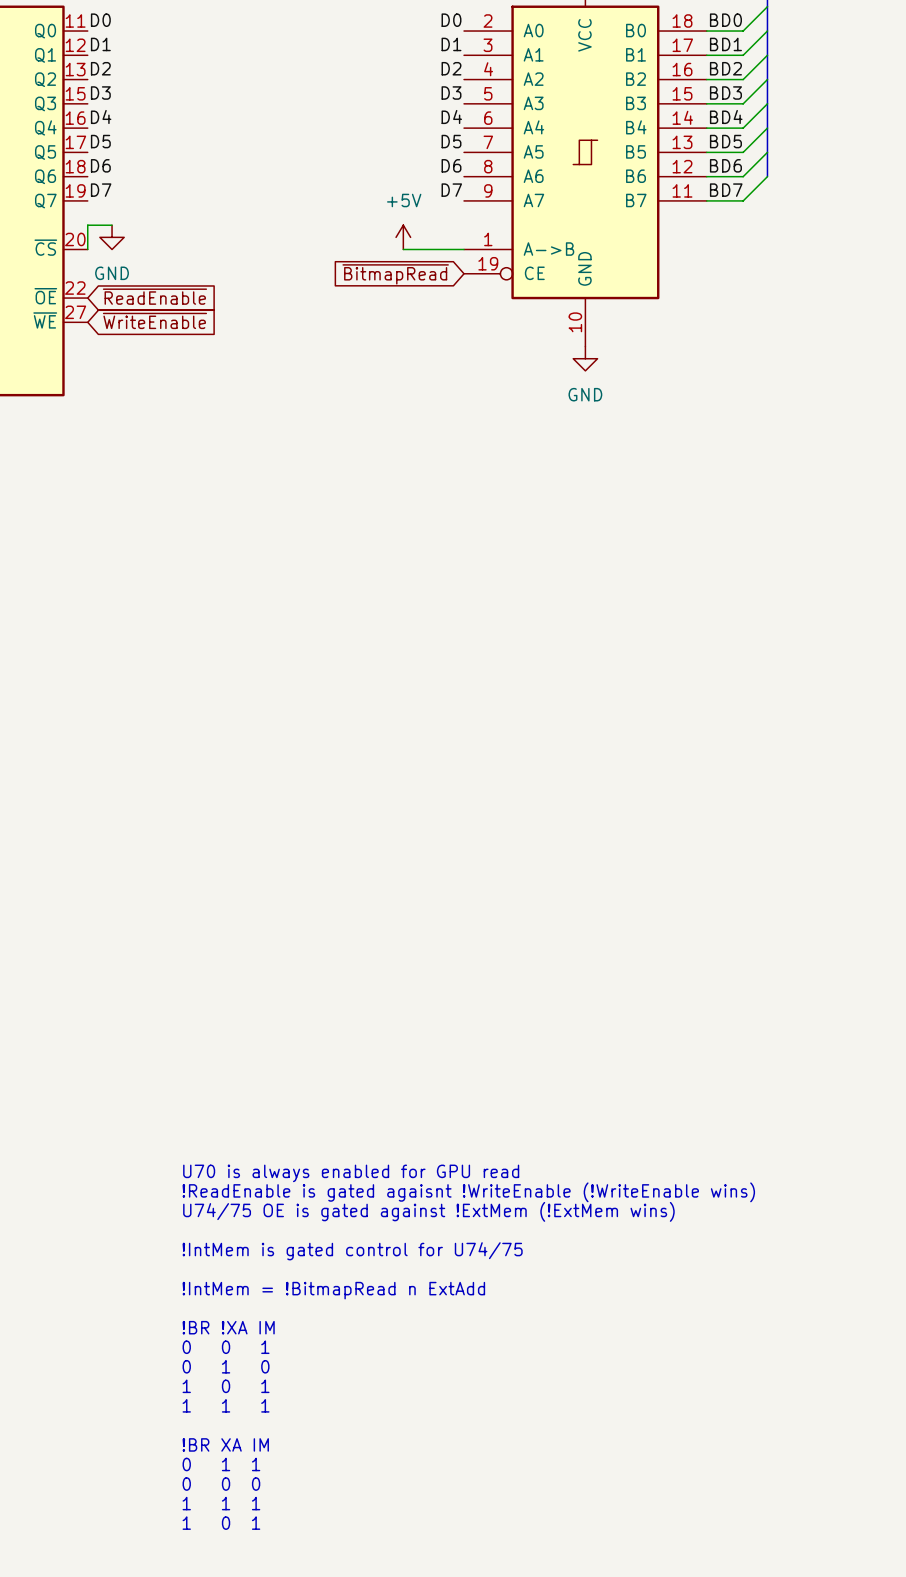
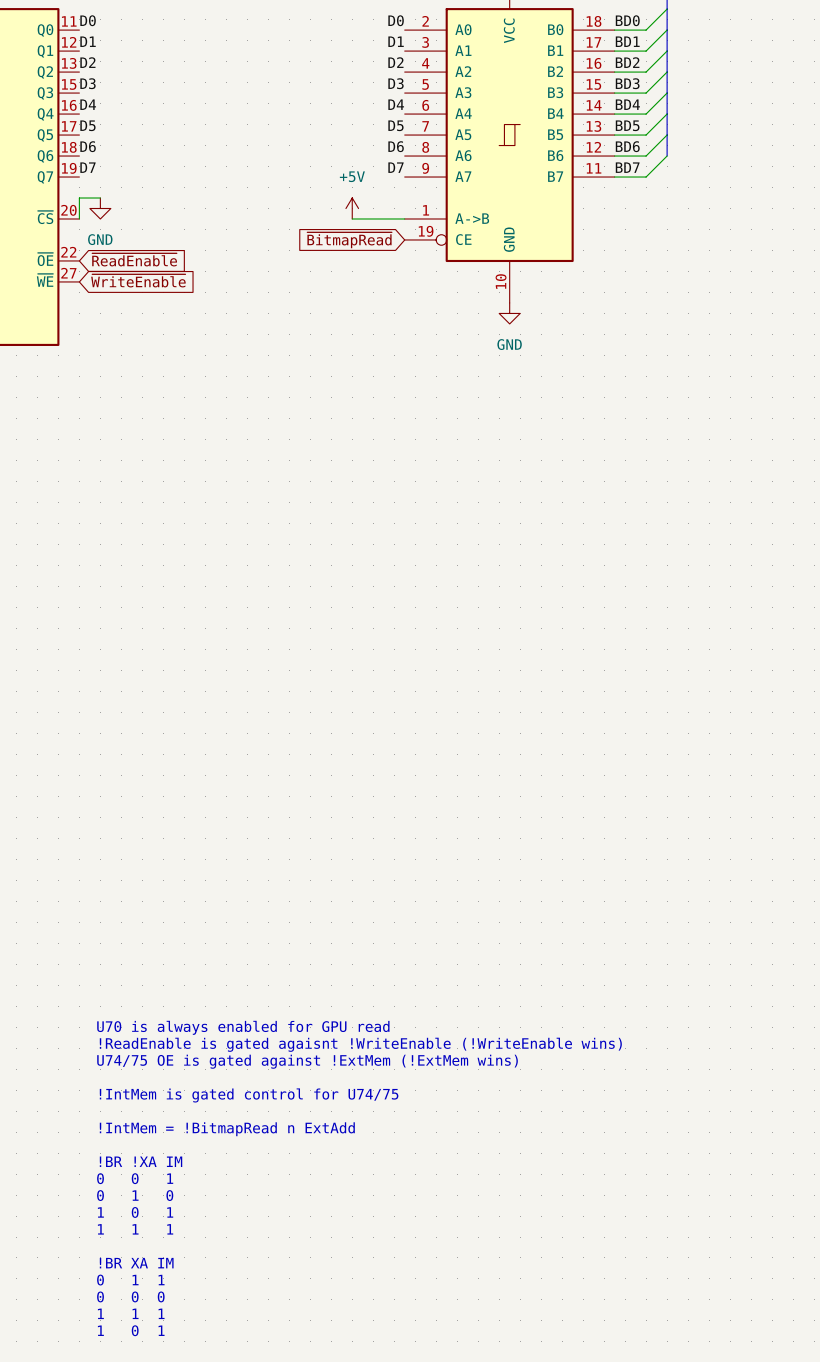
text position: U70 is always enabled for GPU read (351, 1173) -> U70 is always enabled for GPU read (243, 1027)
text position: !ReadEnable is gated agaisnt !WriteEnable (!WriteEnable wins) (468, 1192) -> !ReadEnable is gated agaisnt !WriteEnable (!WriteEnable wins) (360, 1044)
text position: U74/75 OE is gated against !ExtMem (!ExtMem wins) (428, 1211) -> U74/75 OE is gated against !ExtMem (!ExtMem wins) (307, 1061)
text position: !IntMem is gated control for U74/75 (352, 1251) -> !IntMem is gated control for U74/75 (249, 1095)
text position: !IntMem = !BitmapRead n ExtAdd (333, 1290) -> !IntMem = !BitmapRead n ExtAdd (227, 1129)
text position: !BR !XA IM (228, 1327) -> !BR !XA IM (141, 1161)
text position: 0 0 1 (226, 1347) -> 0 0 1 (135, 1178)
text position: 0 1 0 (226, 1366) -> 0 1 0 (135, 1195)
text: 1 0 1 (226, 1386) -> none
text: none -> 1 0 1 (135, 1212)
text: 1 1 1 (226, 1405) -> none
text: none -> 1 1 1 (135, 1229)
text position: !BR XA IM (225, 1444) -> !BR XA IM (136, 1263)
text position: 0 1 1 (221, 1464) -> 0 1 1 (130, 1280)
text position: 0 0 0 (221, 1484) -> 0 0 0 (130, 1296)
text: 1 1 1 (221, 1503) -> none
text: none -> 1 1 1 (131, 1313)
text: 1 0 1 (221, 1523) -> none
text: none -> 1 0 1 (131, 1330)

